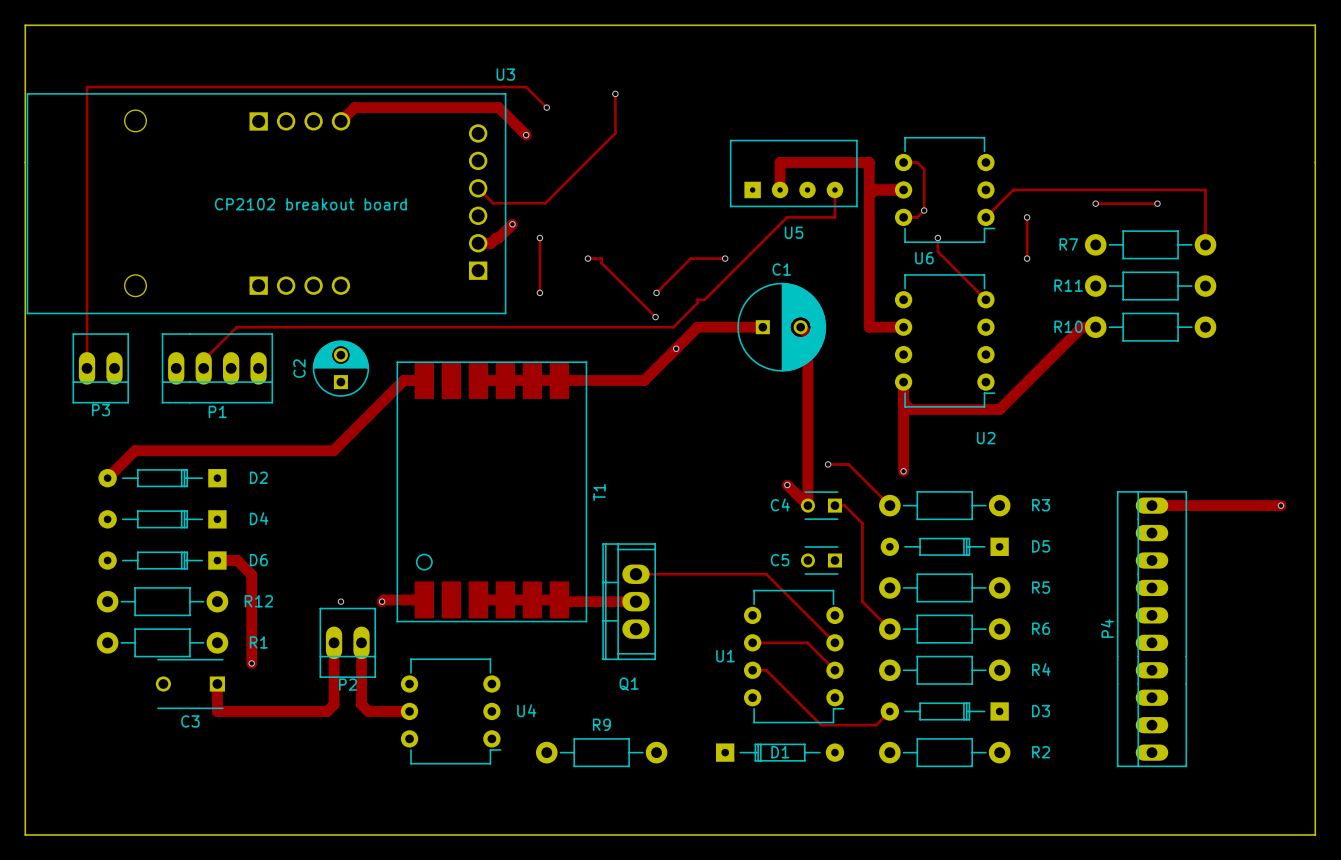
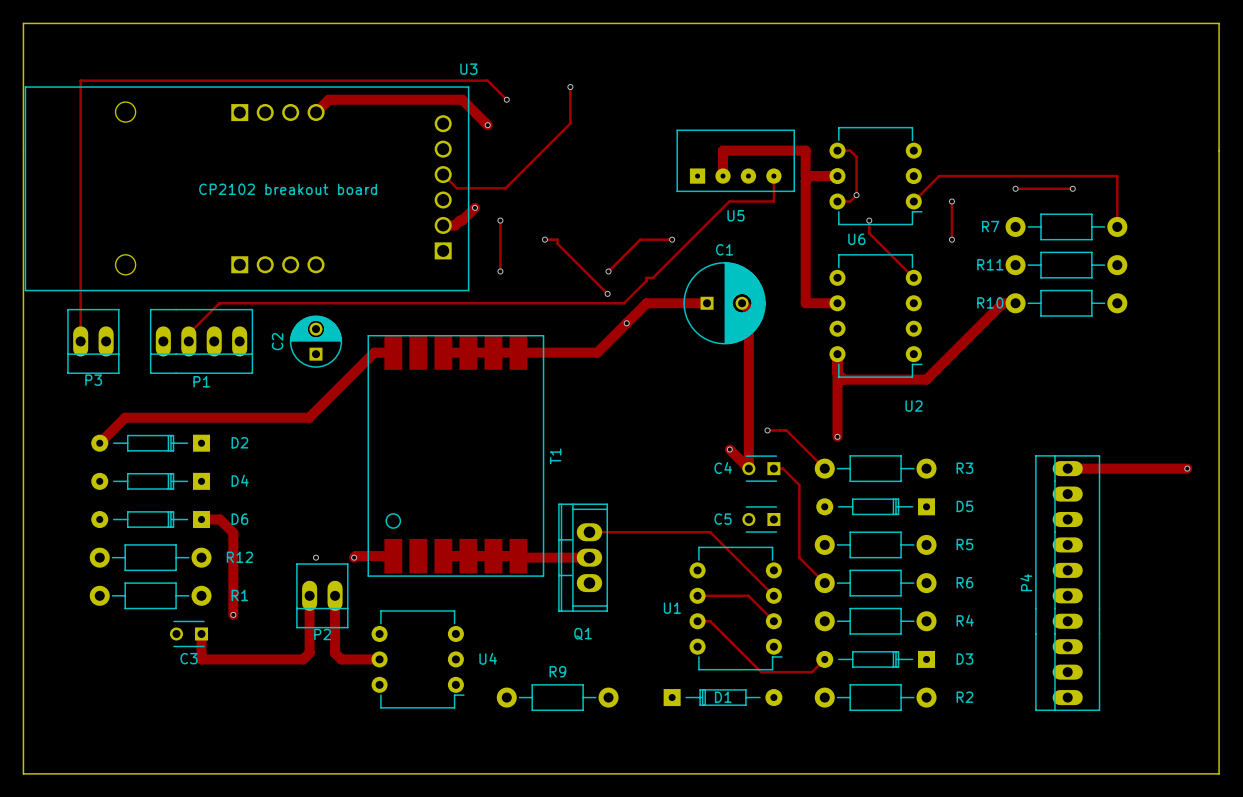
C3 footprint: [155, 658, 225, 710] -> [169, 620, 209, 648]

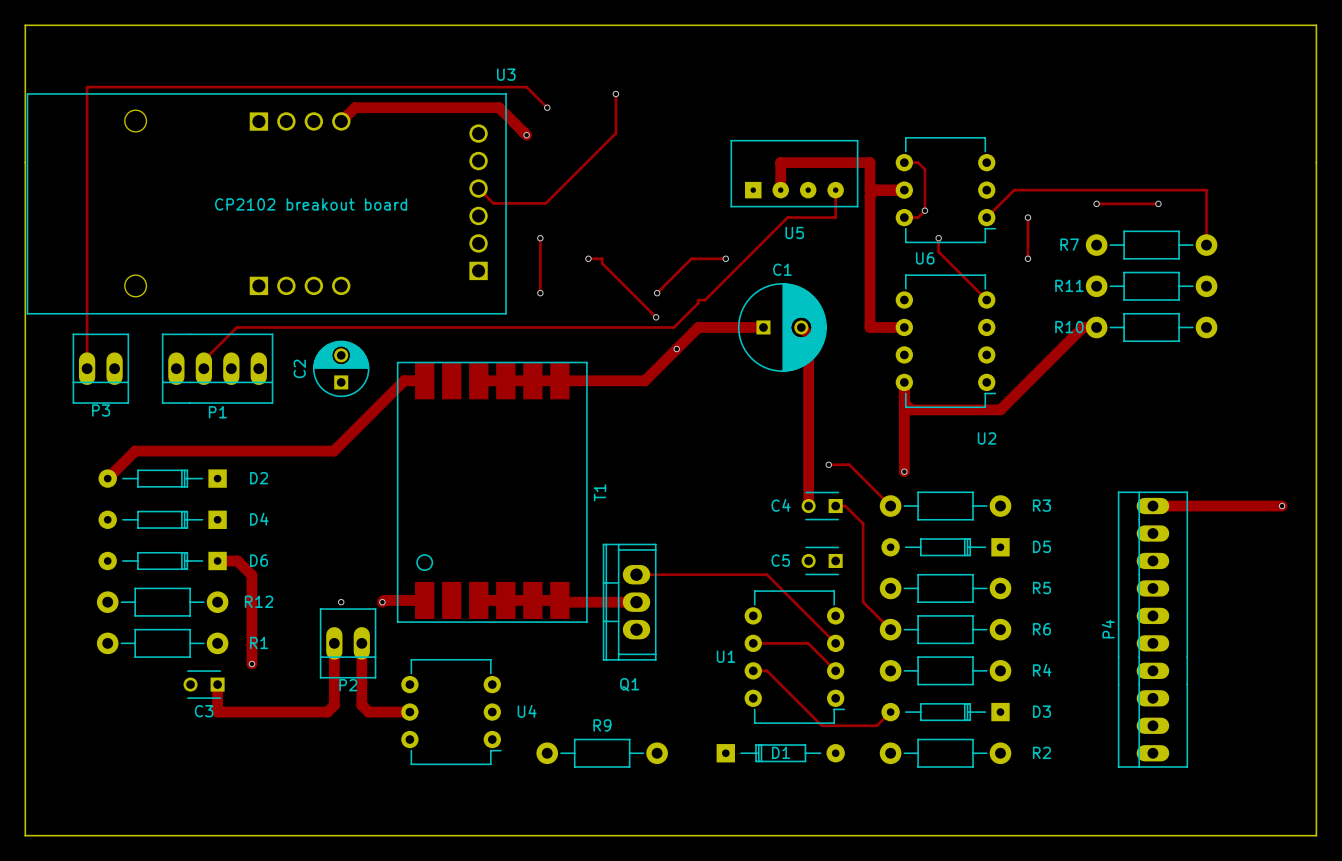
track: (474, 207) (455, 225) (443, 225) -> none
via: (474, 207) -> none
track: (729, 449) (748, 468) -> none
via: (729, 449) -> none

